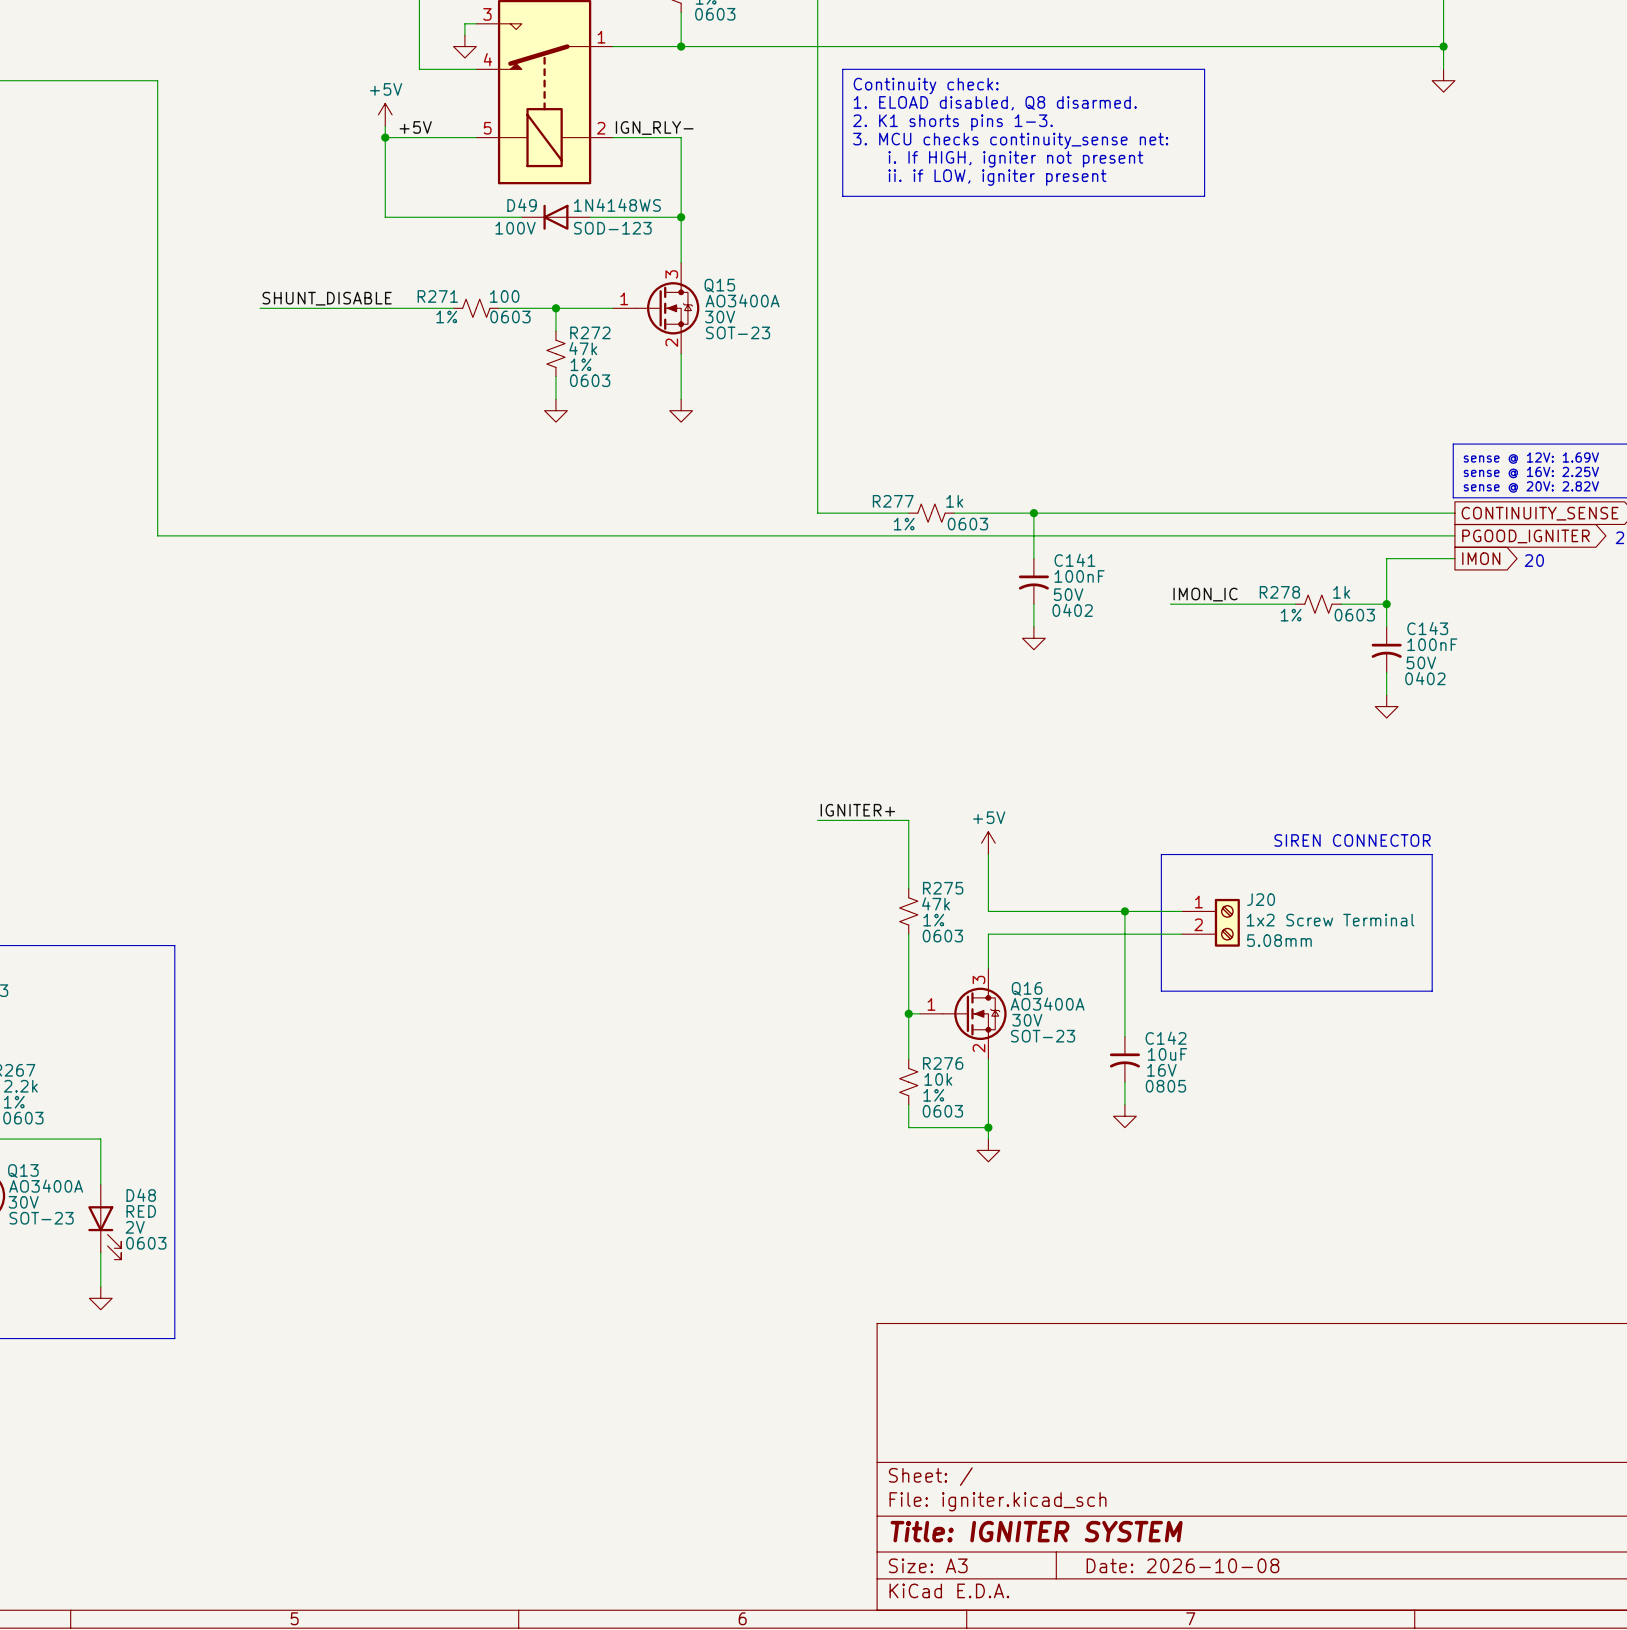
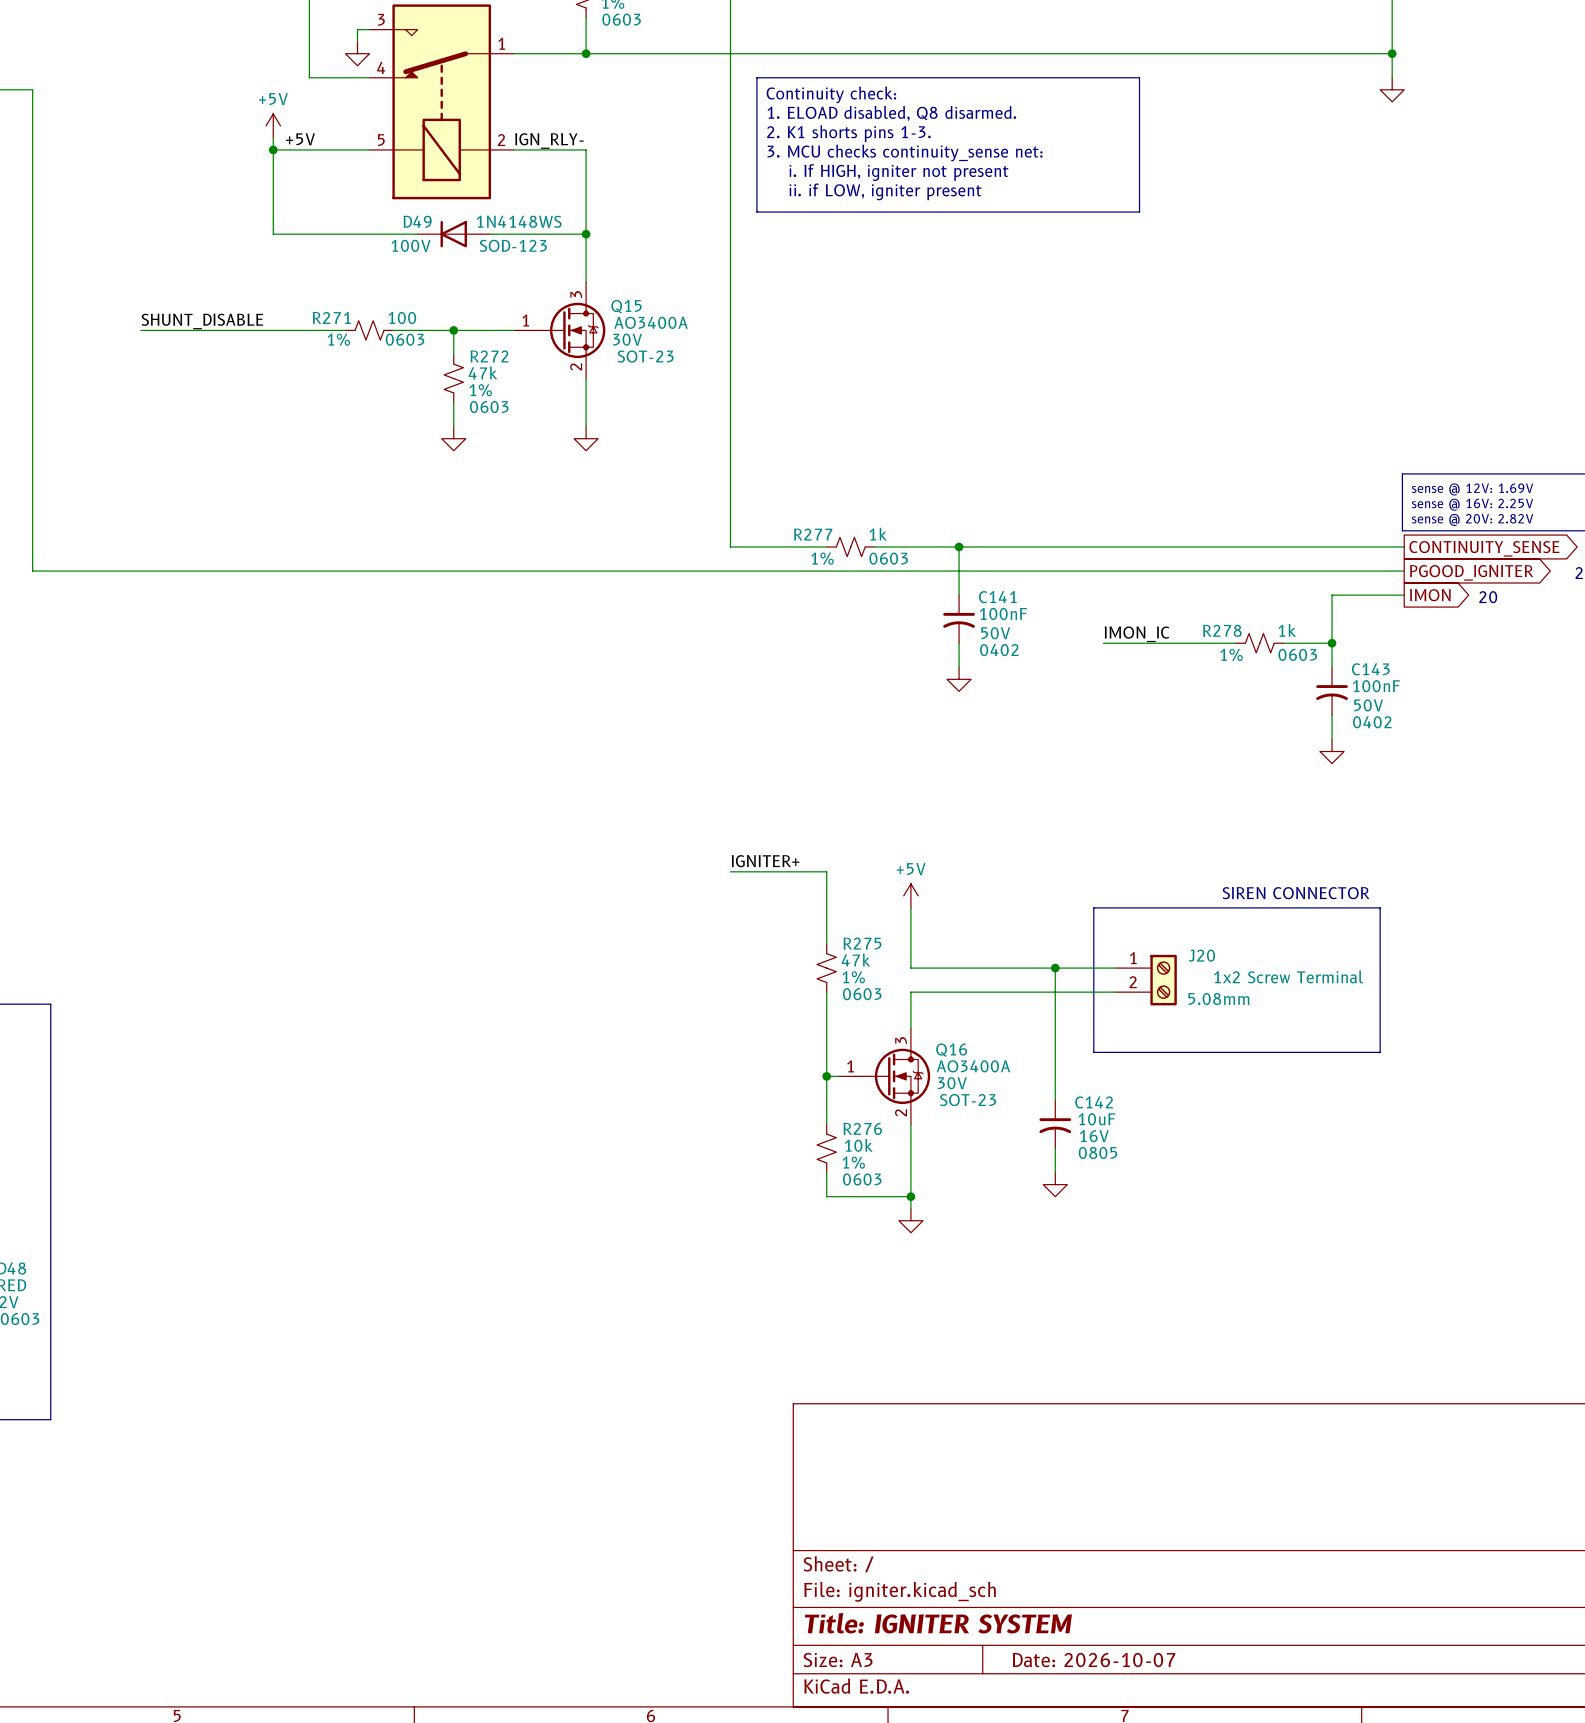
title block: Date: 2026-10-08 (1182, 1565) -> Date: 2026-10-07 (1093, 1660)

